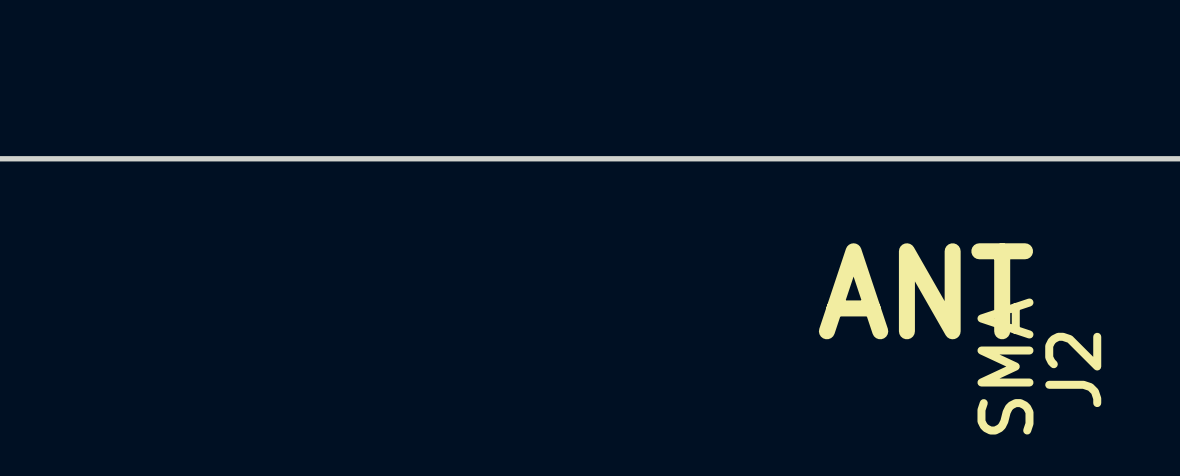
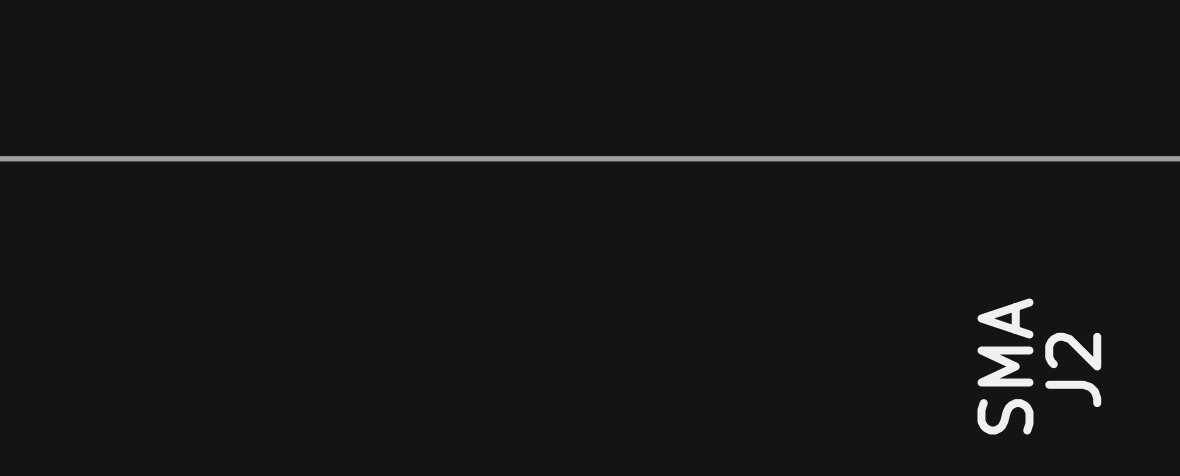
text: ANT (925, 291) -> none

